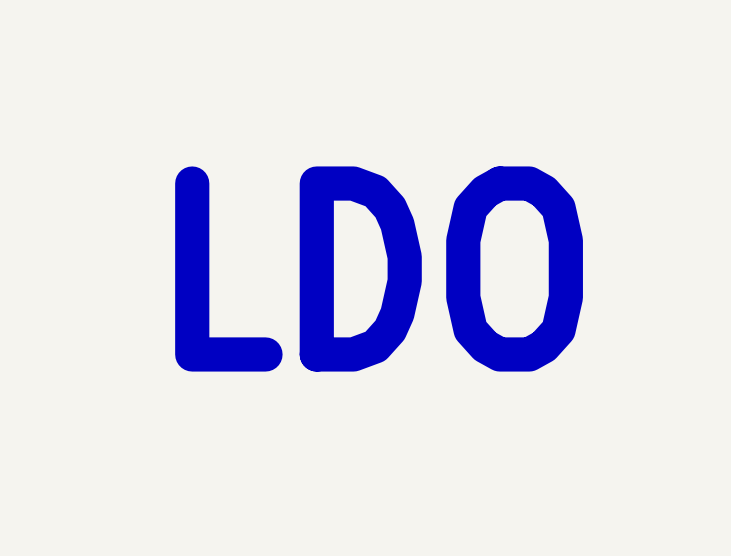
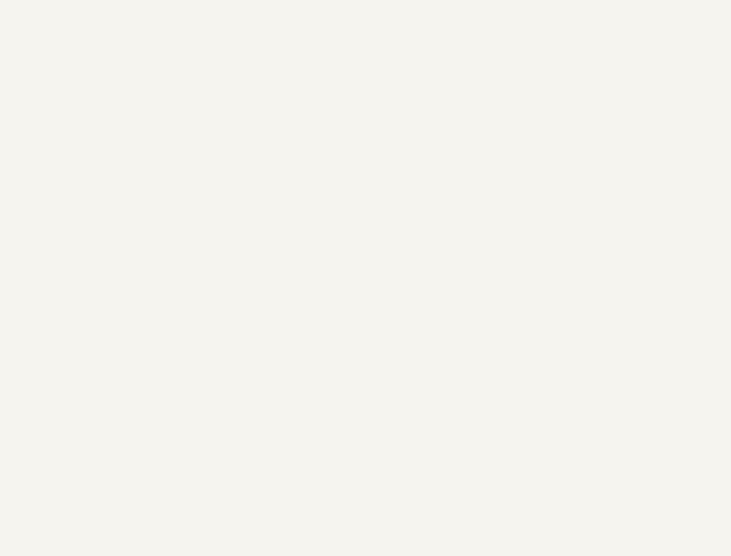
text: LDO (379, 269) -> none

